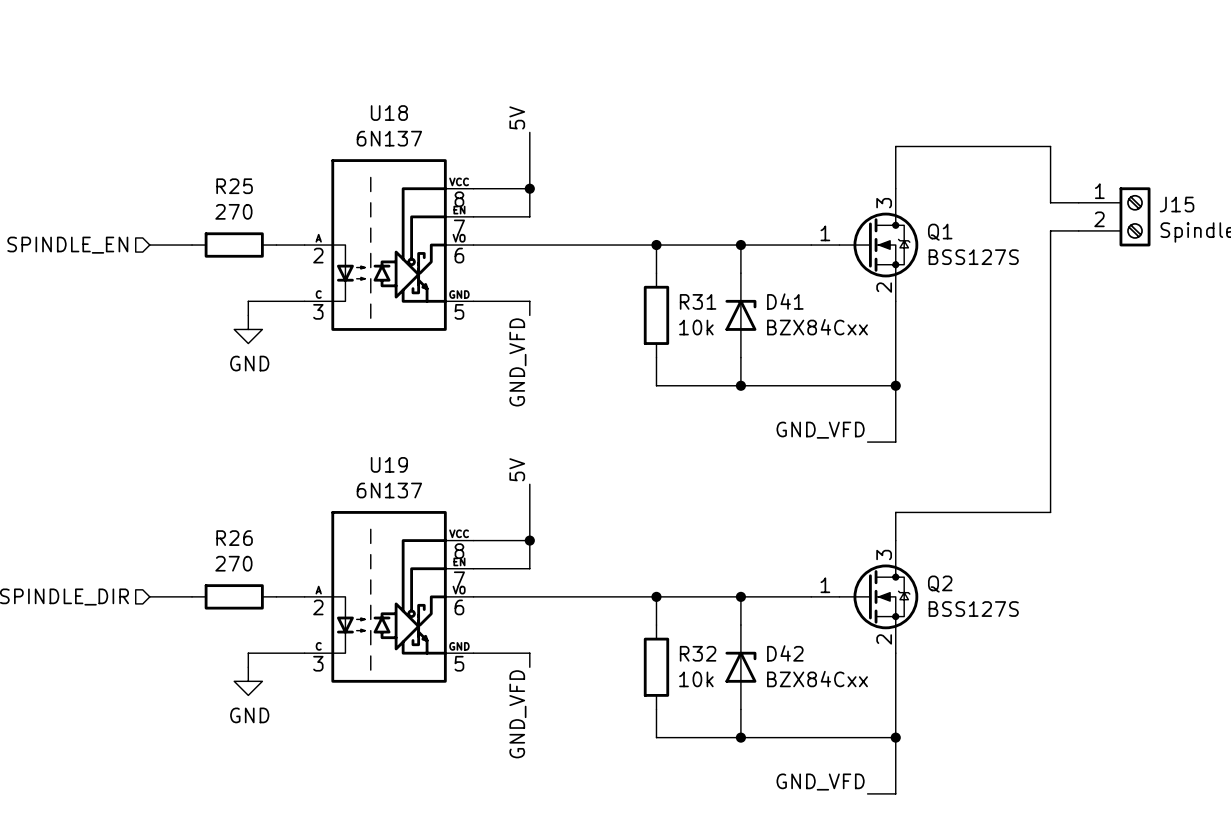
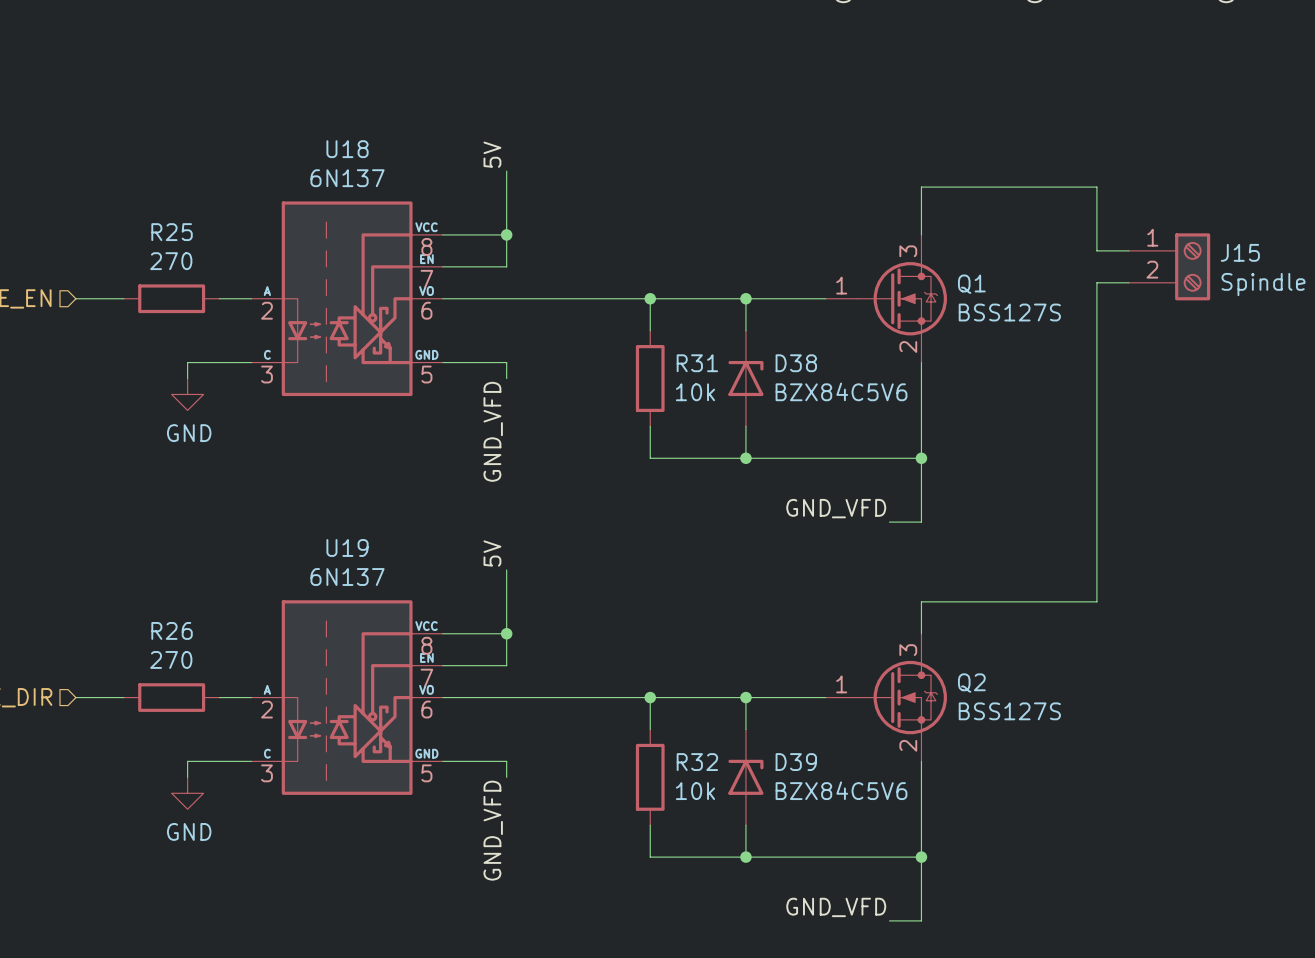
D41 name: D41 (785, 301) -> D38 (796, 363)
D41 value: BZX84Cxx (817, 327) -> BZX84C5V6 (841, 391)
D42 name: D42 (785, 653) -> D39 (796, 762)
D42 value: BZX84Cxx (817, 679) -> BZX84C5V6 (841, 790)

